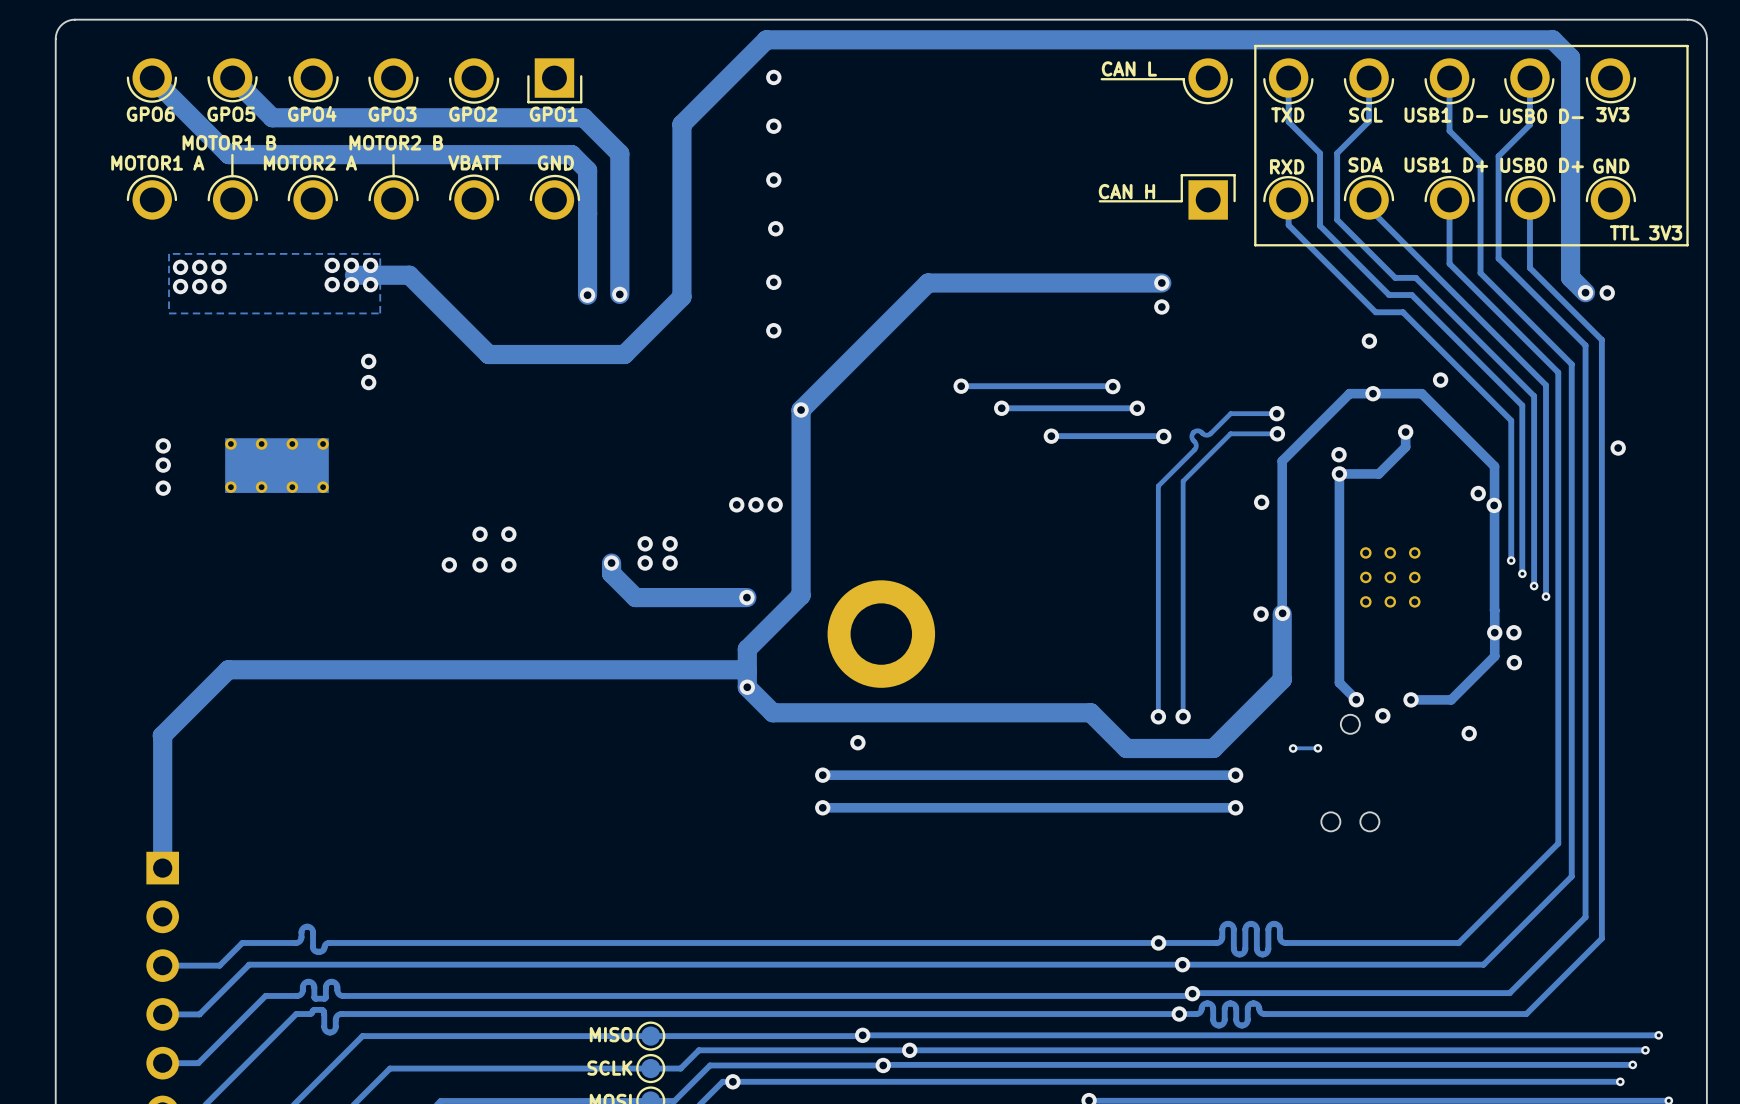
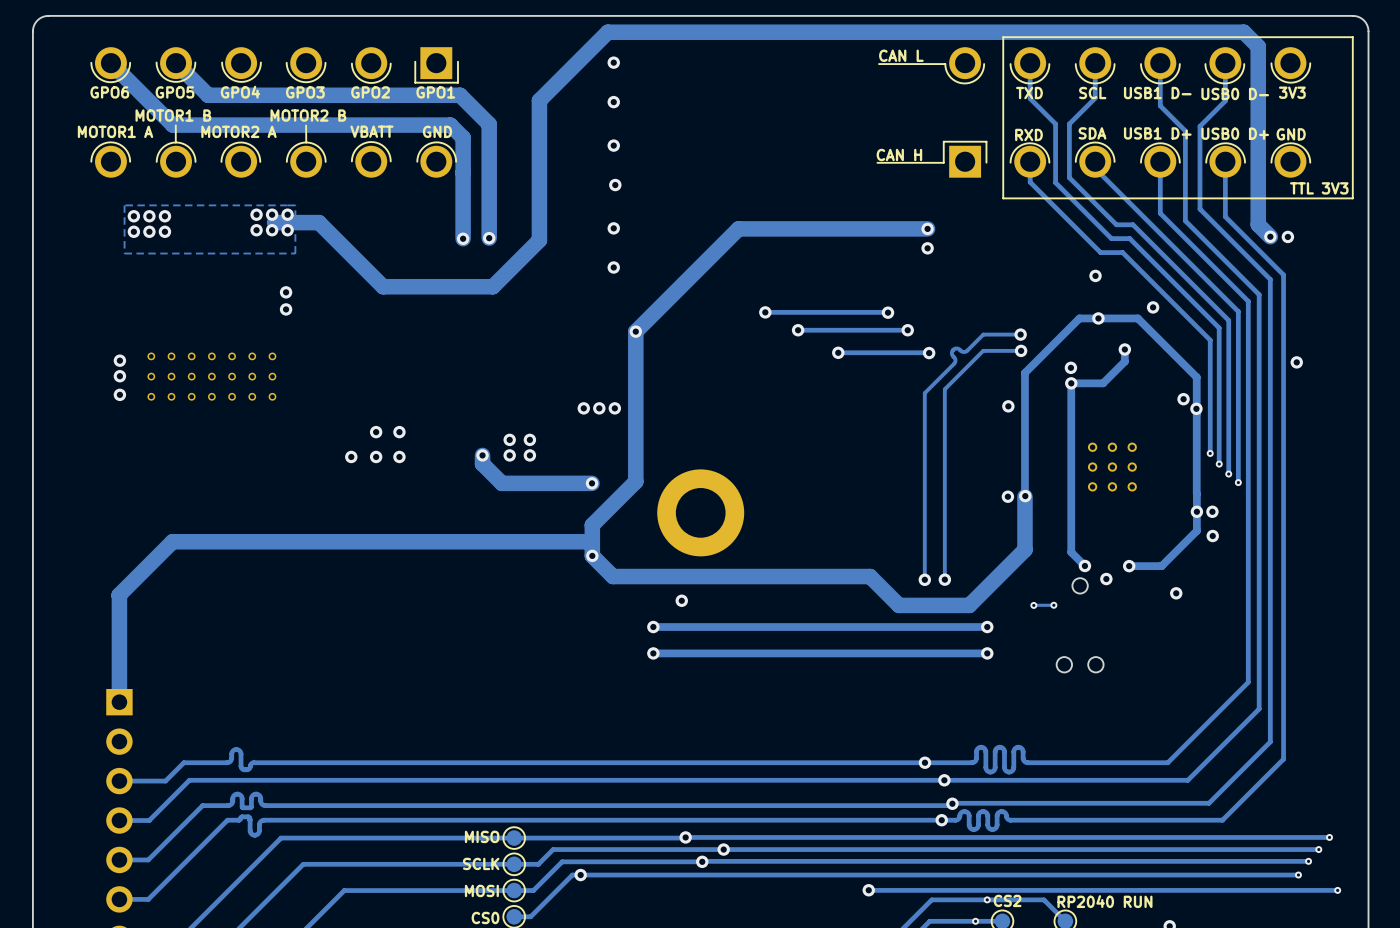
part footprint: [225, 438, 329, 493] -> [147, 352, 277, 401]

